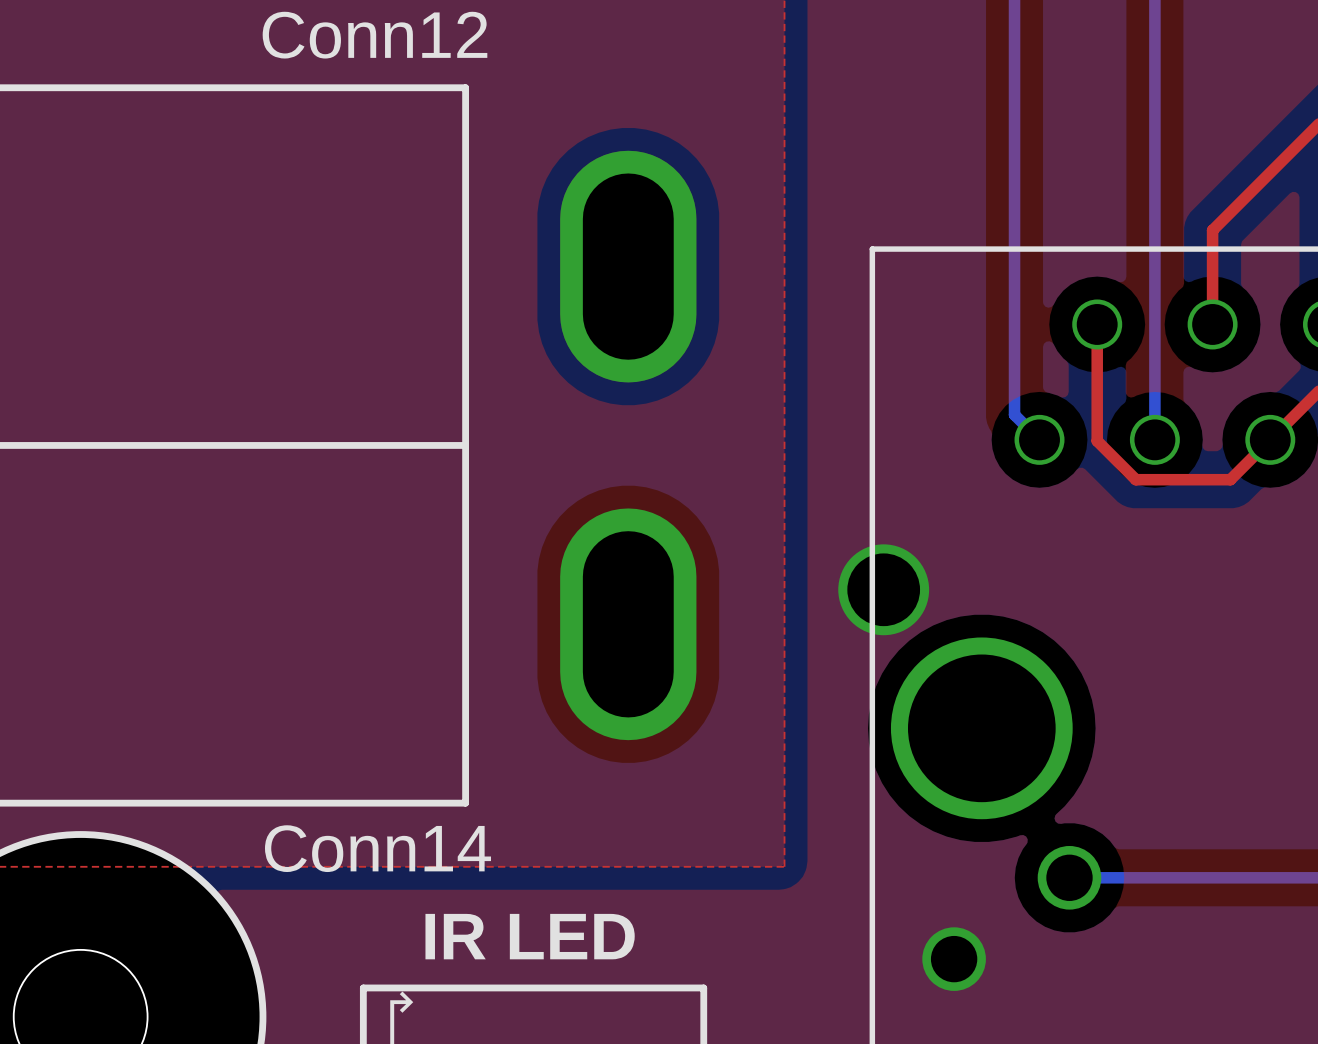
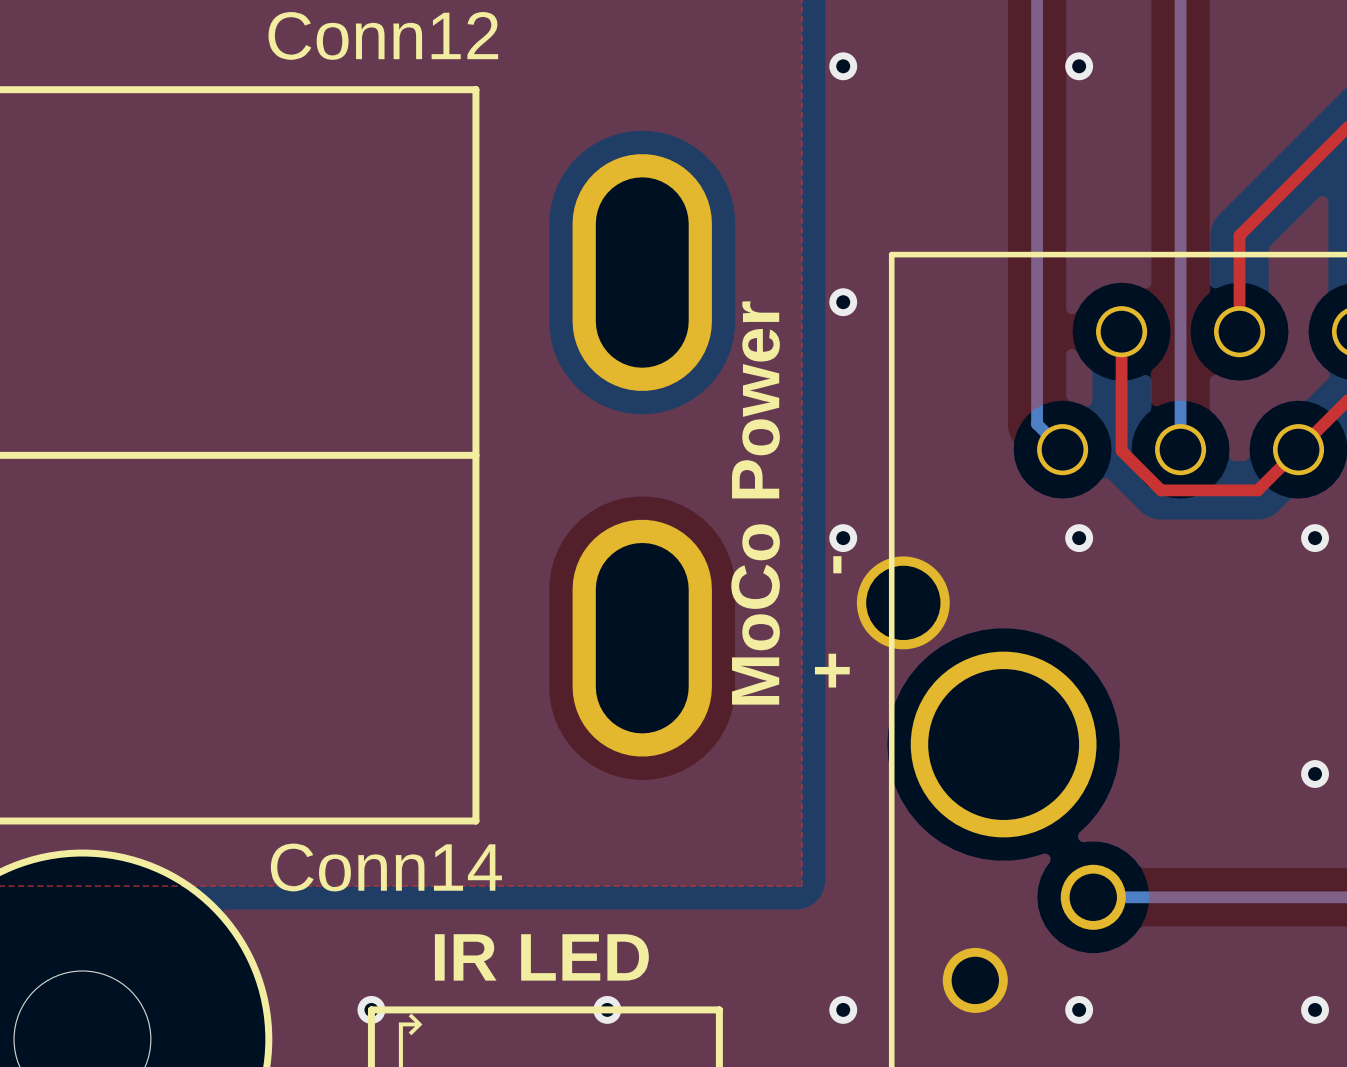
via: none -> (843, 66)
via: none -> (1079, 66)
via: none -> (843, 302)
text: none -> MoCo Power (755, 503)
via: none -> (843, 538)
via: none -> (1079, 538)
via: none -> (1315, 538)
text: none -> + - (832, 621)
via: none -> (1315, 774)
via: none -> (371, 1009)
via: none -> (607, 1009)
via: none -> (843, 1009)
via: none -> (1079, 1009)
via: none -> (1315, 1009)

